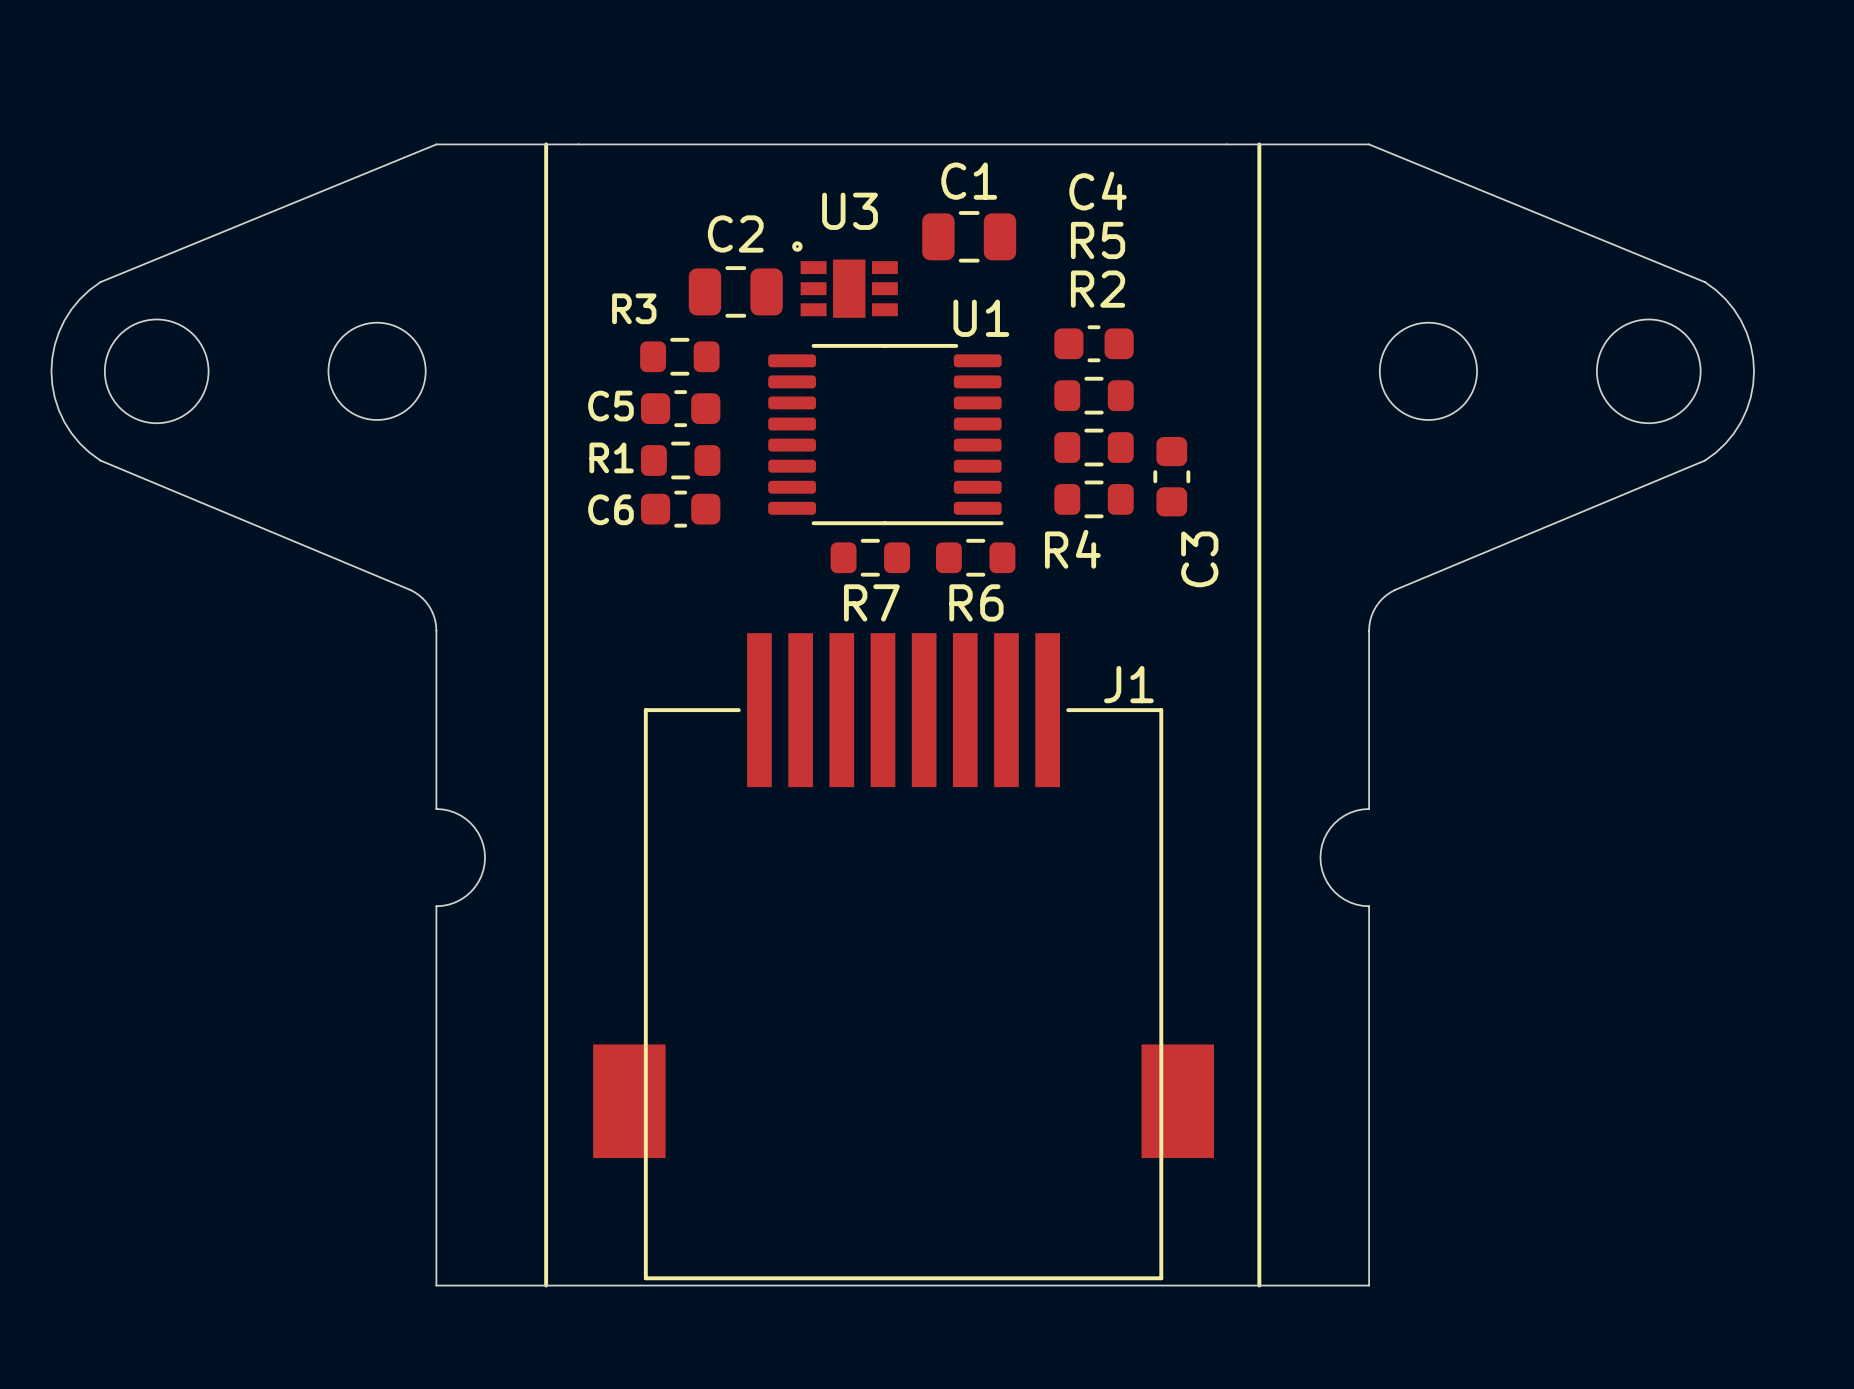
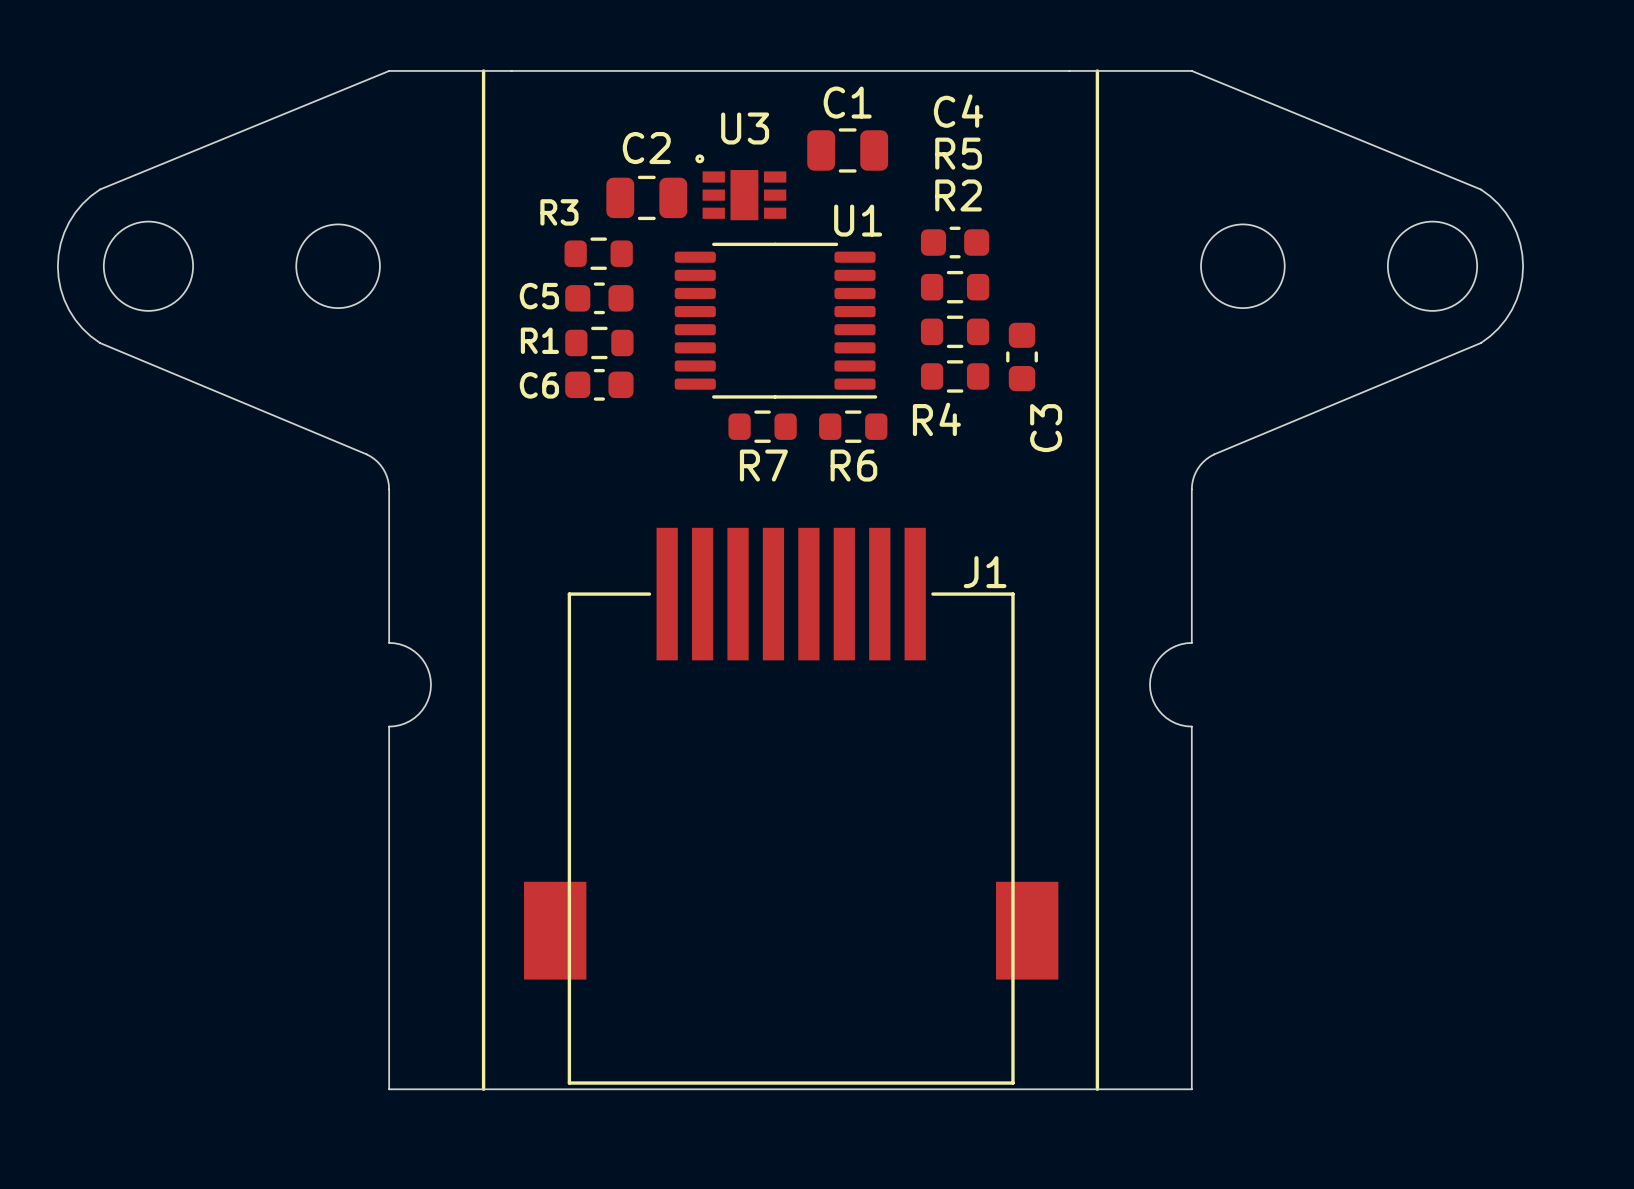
J1 position: (903, 956) -> (791, 806)
board edge: (436, 1285) (1369, 1285) -> (389, 1053) (389, 1089) (1191, 1089) (1191, 1053)
line: none -> (483, 1053) (483, 1089)
line: none -> (1097, 1053) (1097, 1089)

